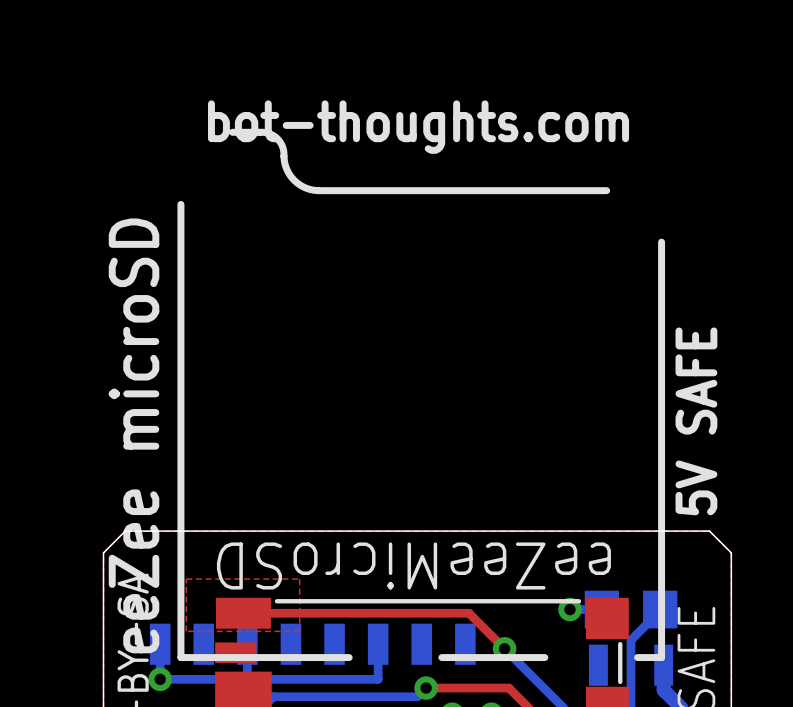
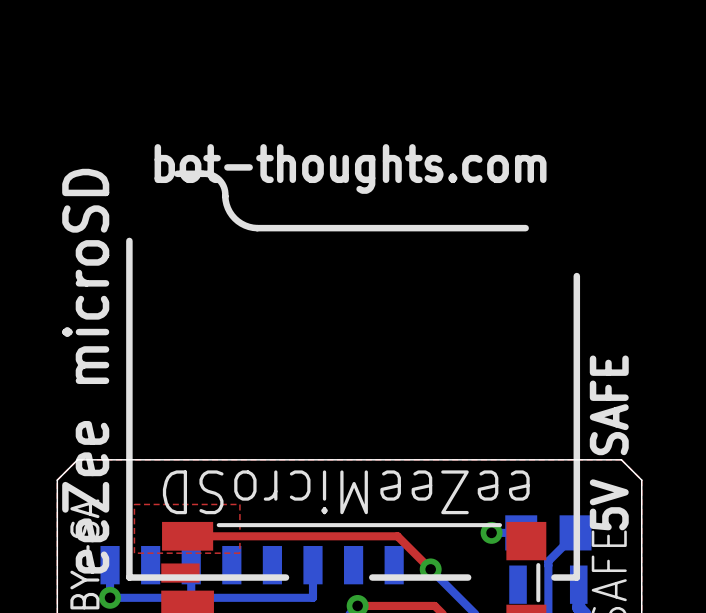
text position: bot-thoughts.com (418, 127) -> bot-thoughts.com (350, 168)
line: (232, 132) (265, 132) (275, 136) (282, 145) (285, 165) (291, 177) (301, 185) (313, 190) (606, 190) -> (177, 173) (208, 174) (217, 178) (223, 186) (226, 204) (232, 215) (241, 223) (253, 227) (525, 228)
line: (180, 204) (180, 295) -> none
line: (661, 242) (661, 333) -> none
text position: 5V SAFE (696, 421) -> 5V SAFE (609, 442)

